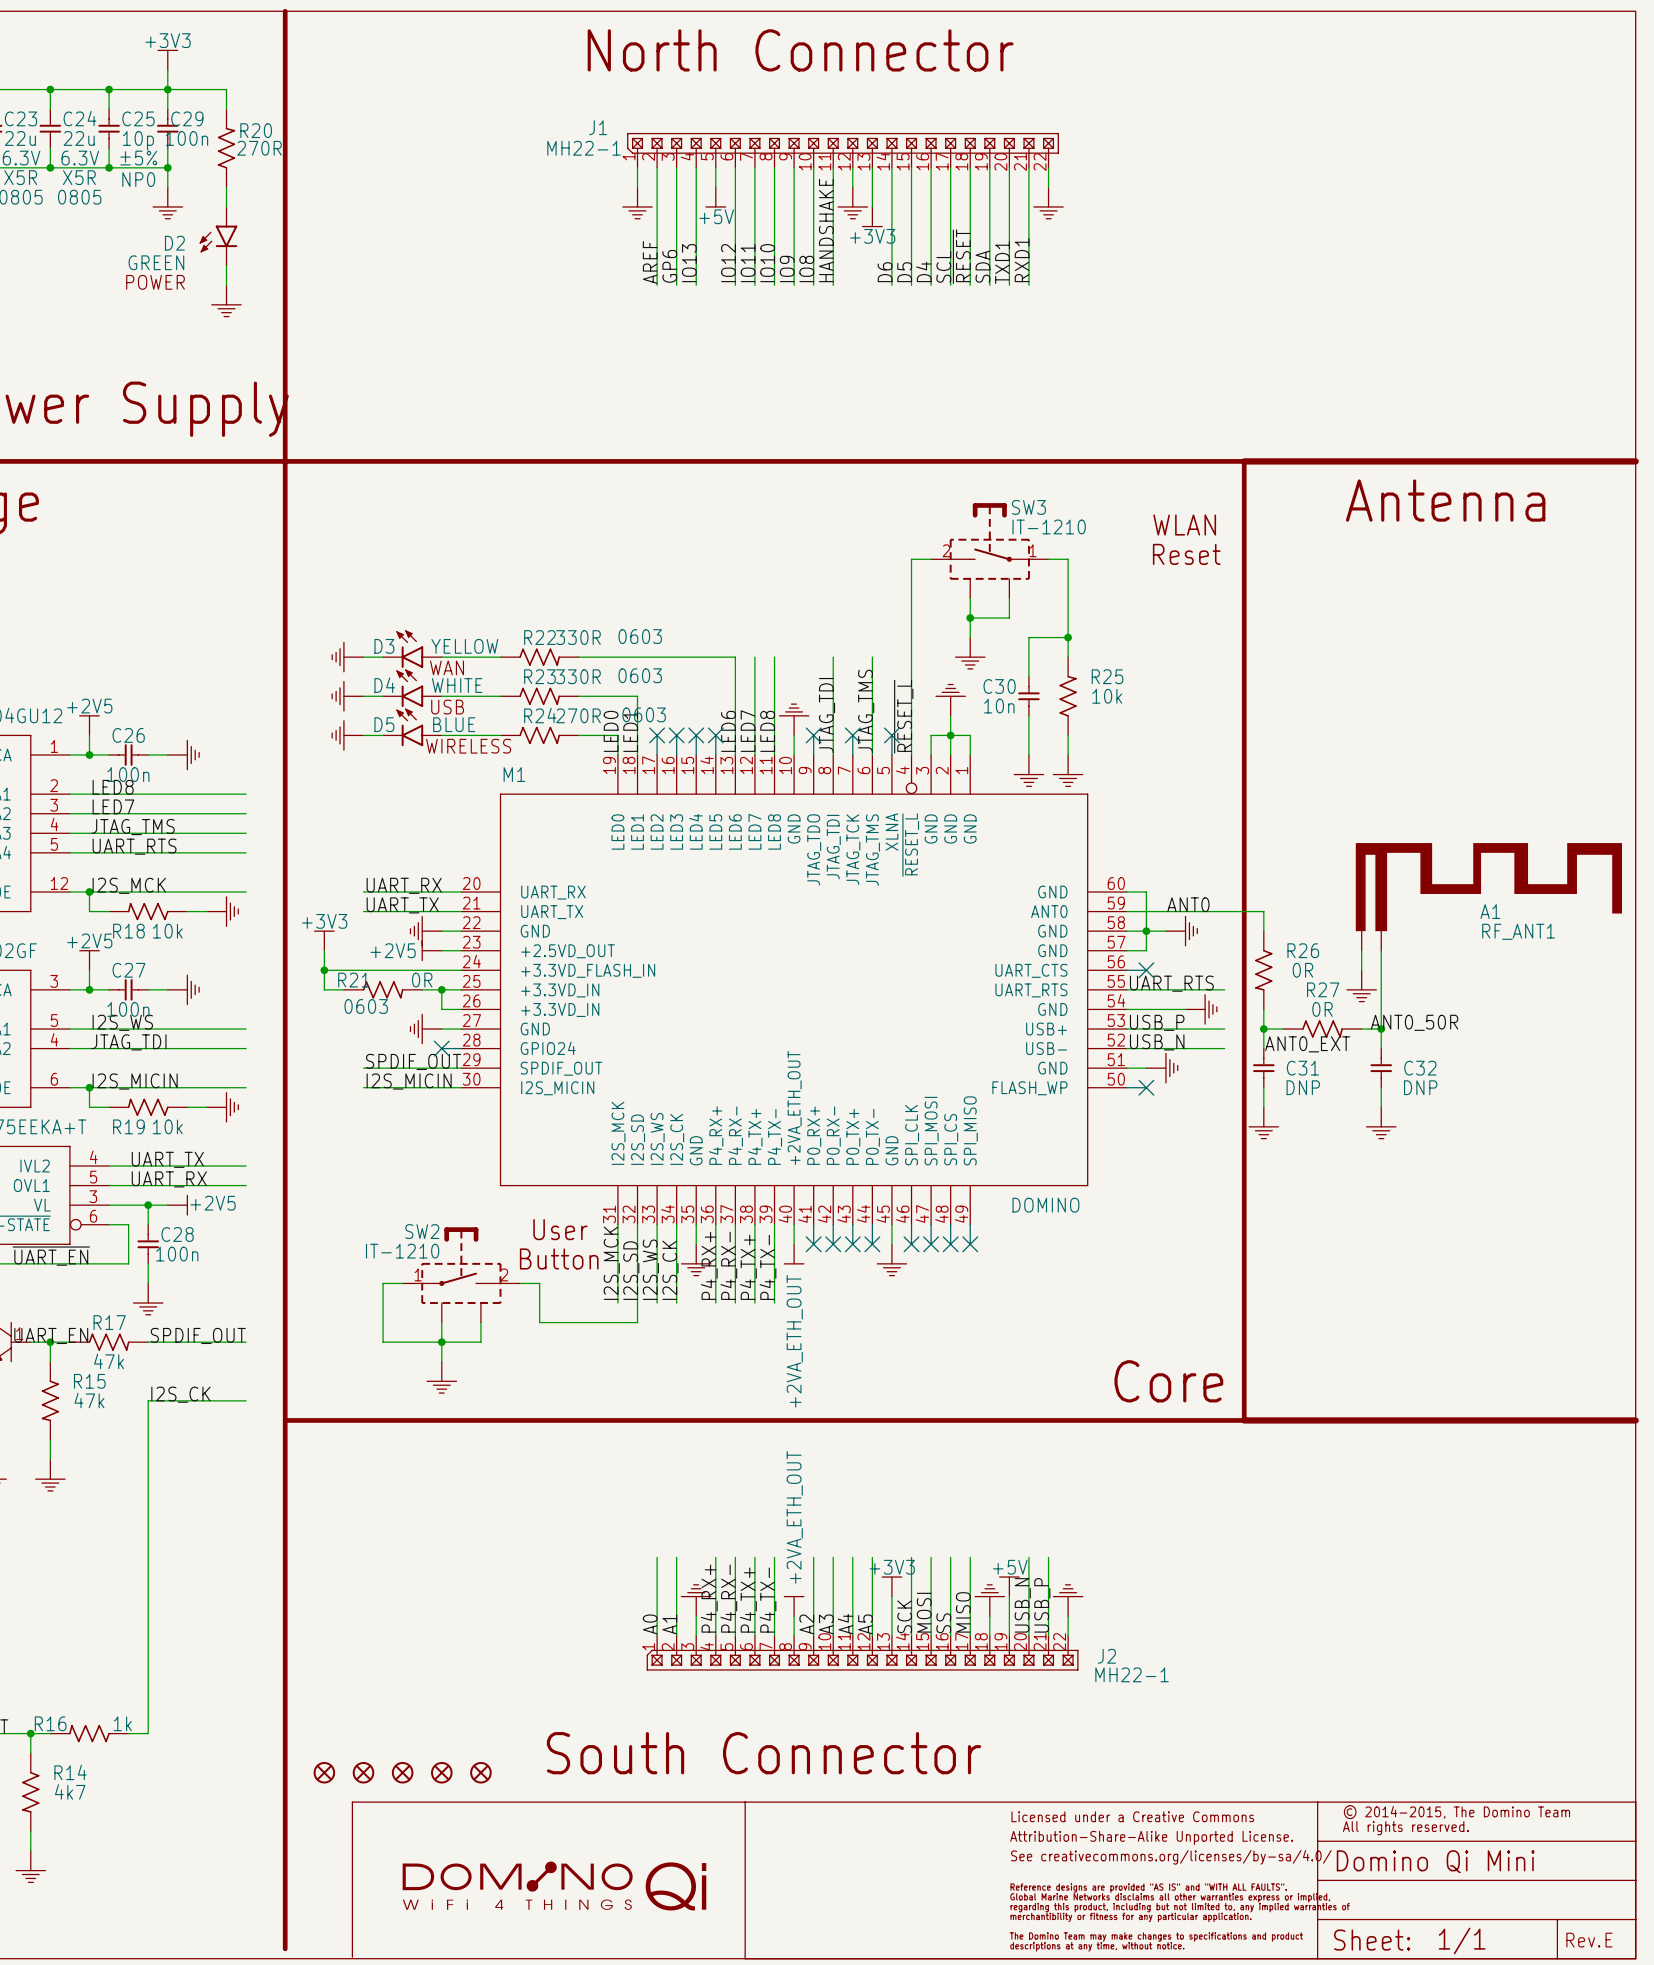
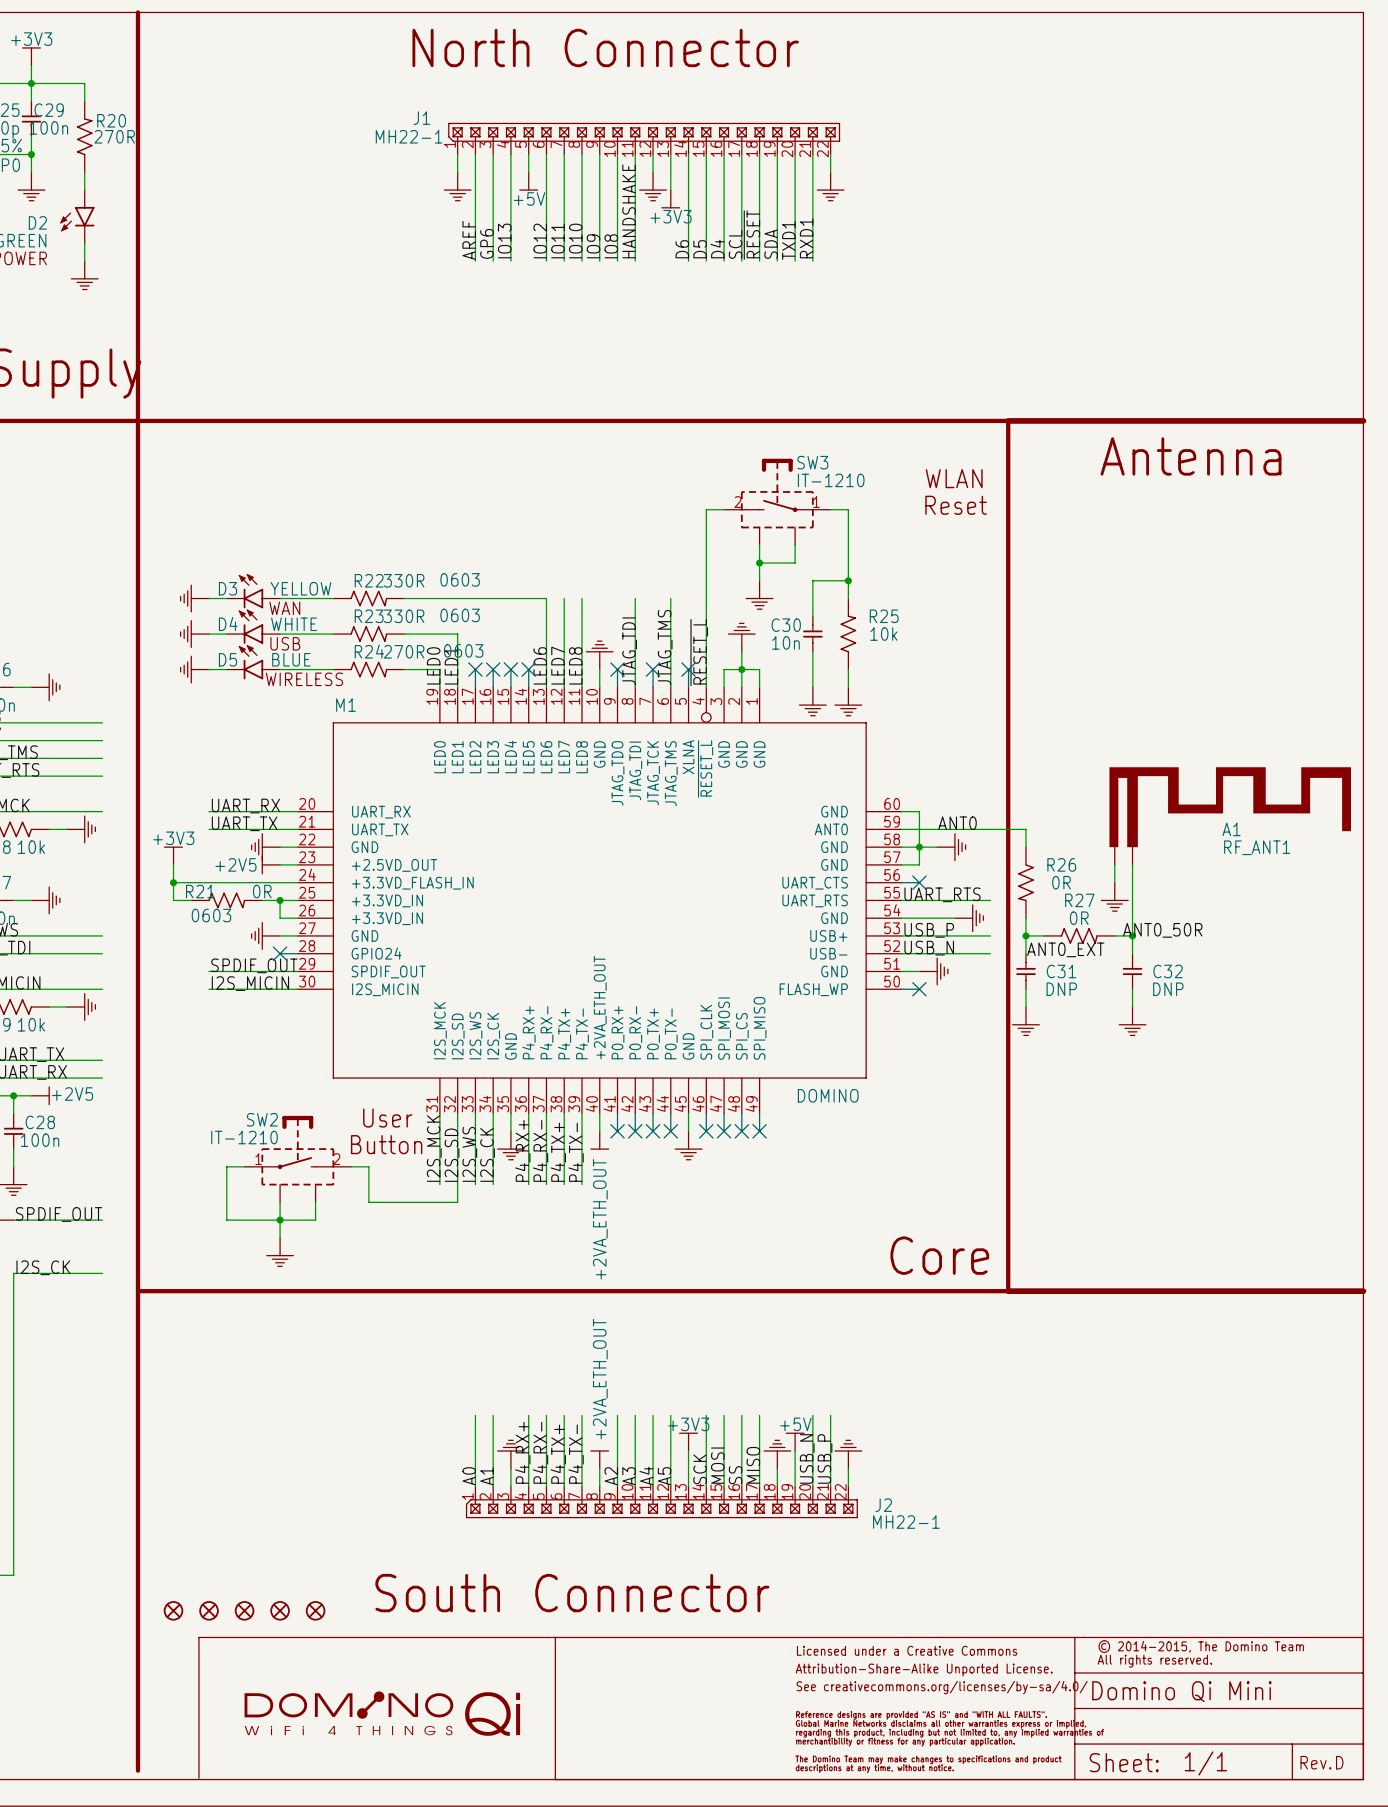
text: E (1609, 1940) -> D (1339, 1762)

